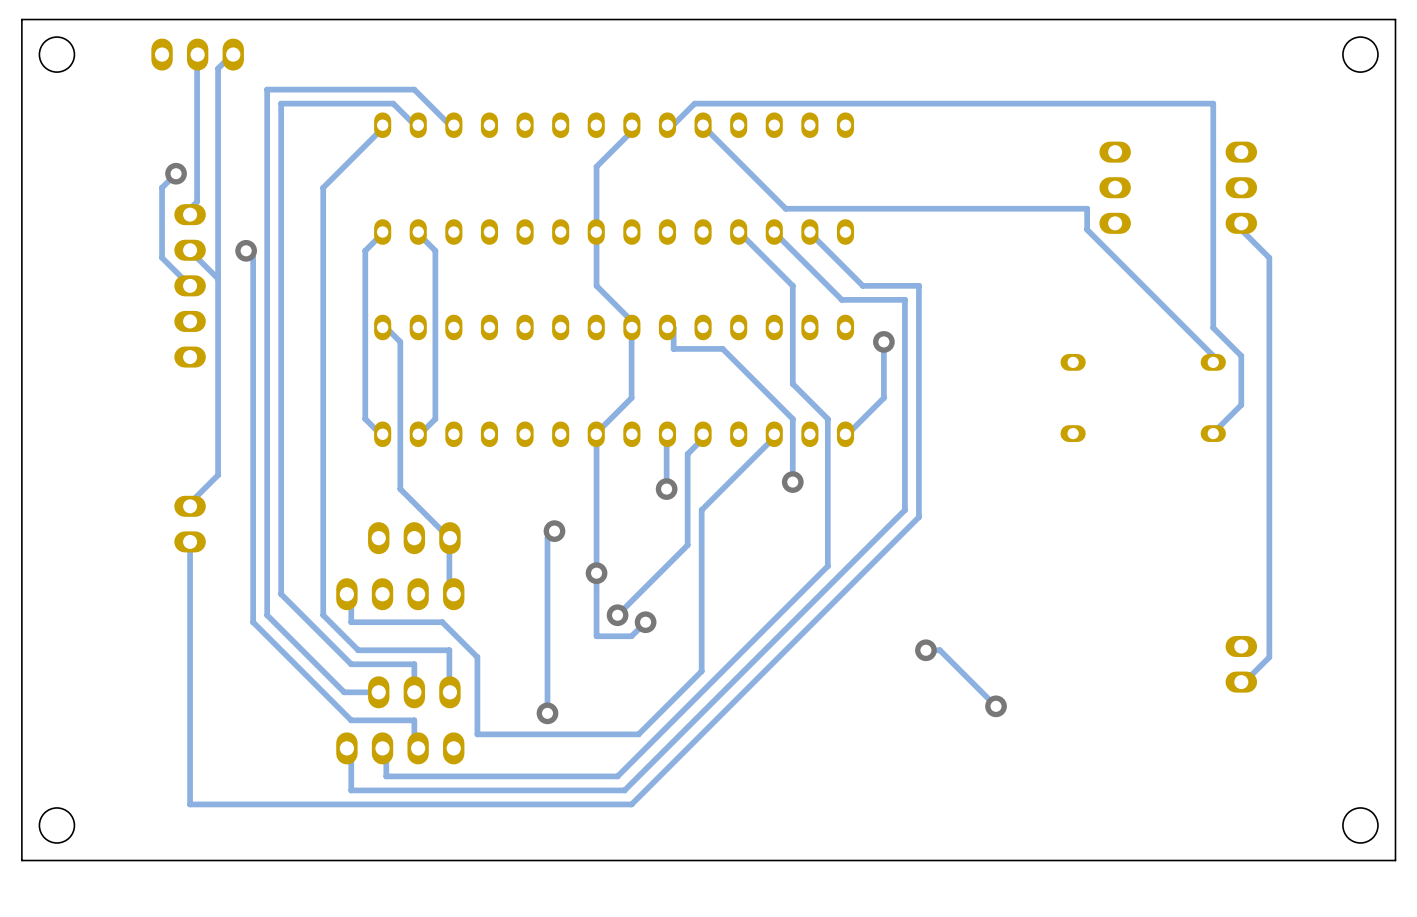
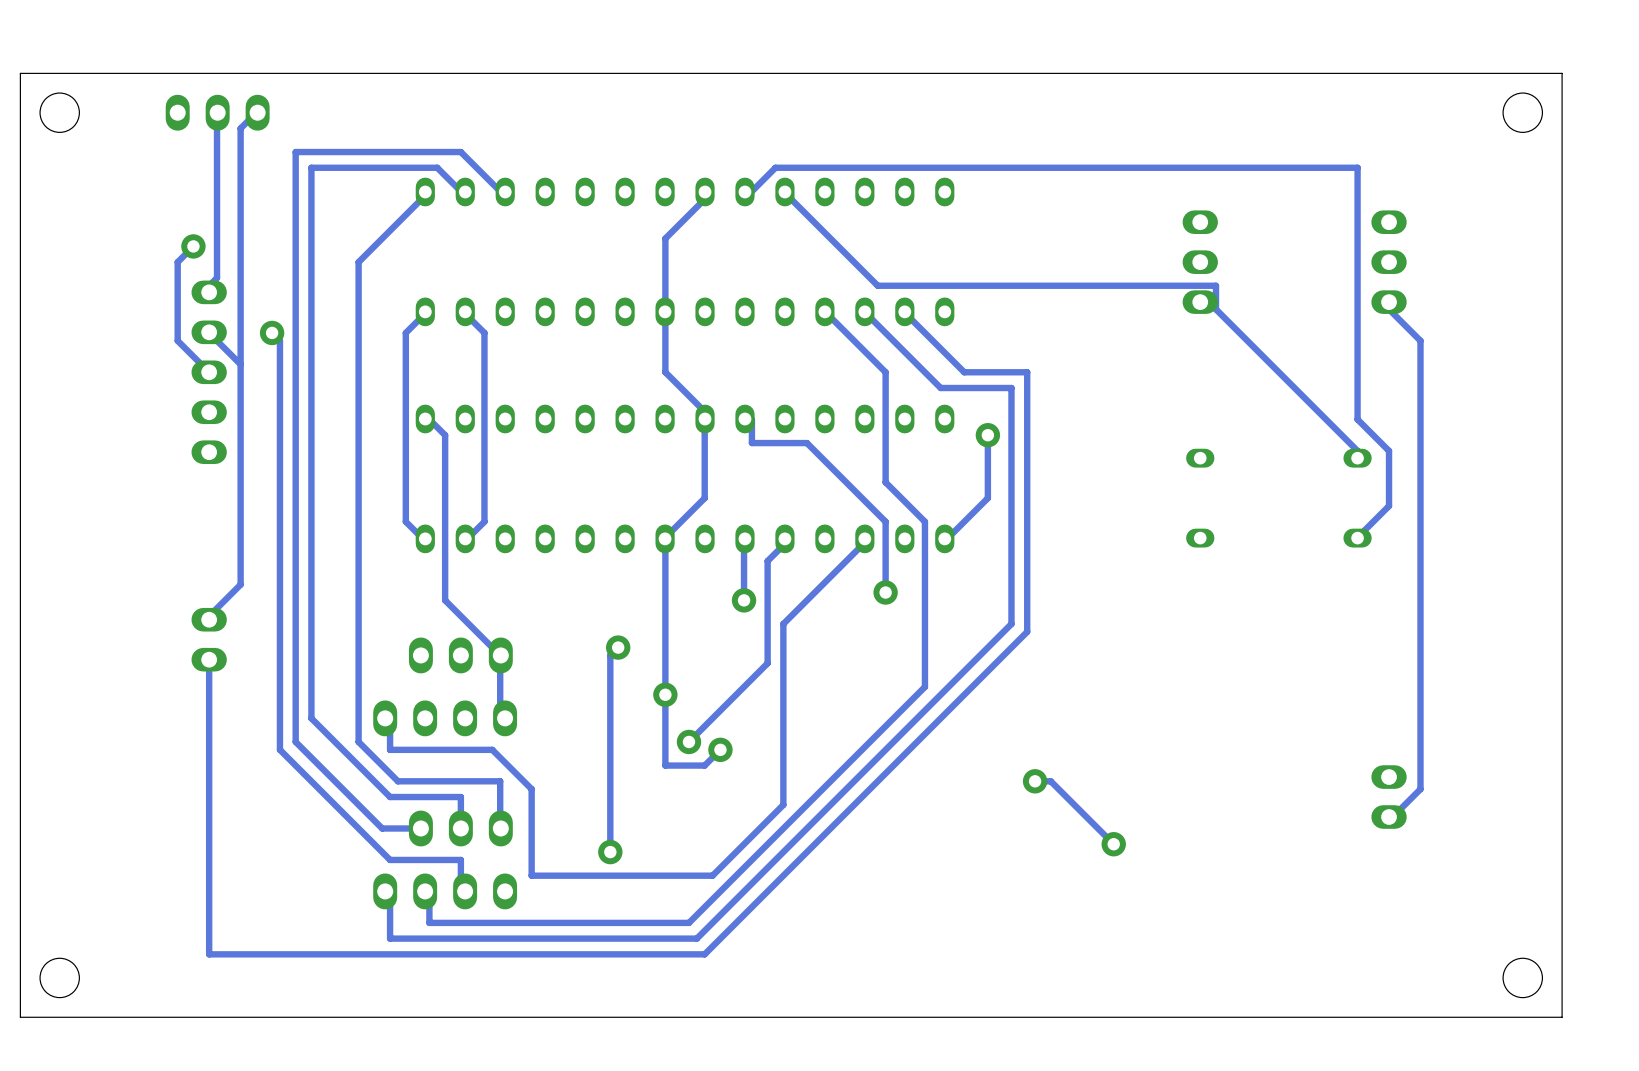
part position: (1115, 187) -> (1200, 262)

